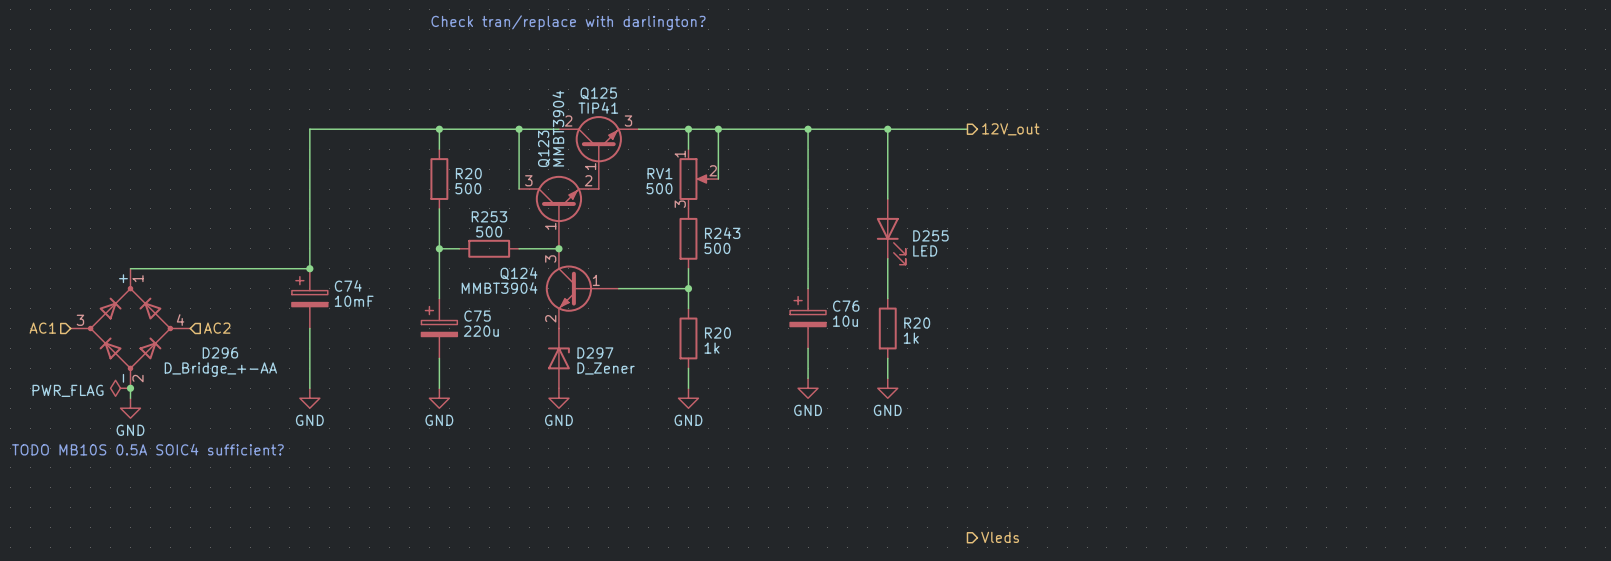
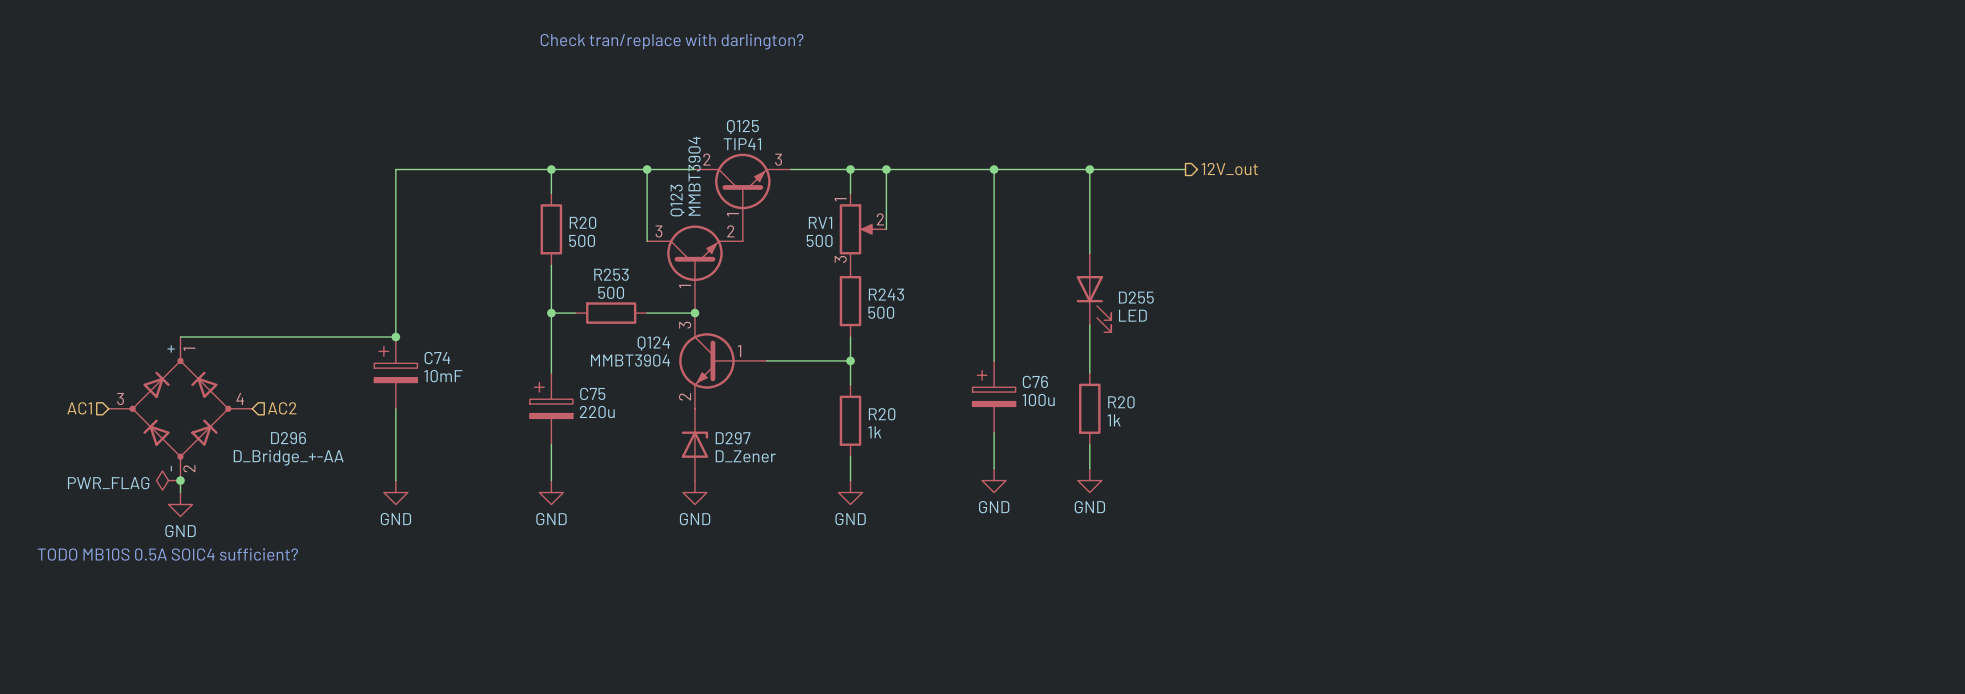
C76 value: 10u (845, 321) -> 100u (1038, 400)
hierarchical label: Vleds (1000, 537) -> none

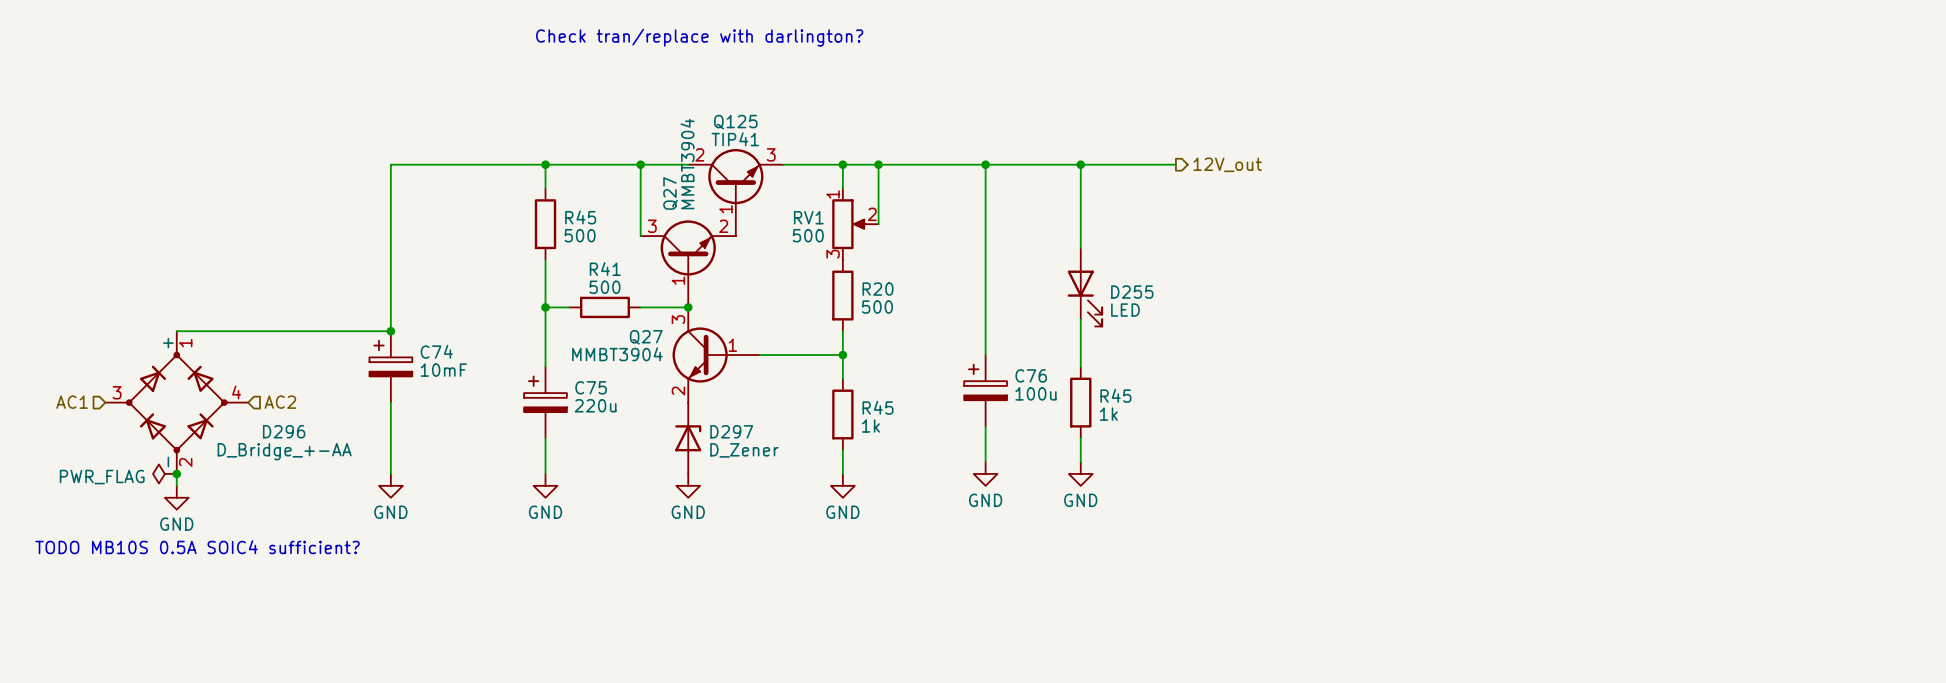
Q123 name: Q123 (677, 200) -> Q27 (670, 193)
R20 name: R20 (582, 222) -> R45 (580, 217)
R253 name: R253 (611, 274) -> R41 (605, 269)
R243 name: R243 (886, 294) -> R20 (878, 289)
Q124 name: Q124 (653, 343) -> Q27 (646, 337)
R20 name: R20 (1121, 402) -> R45 (1115, 395)
R20 name: R20 (882, 414) -> R45 (878, 407)

